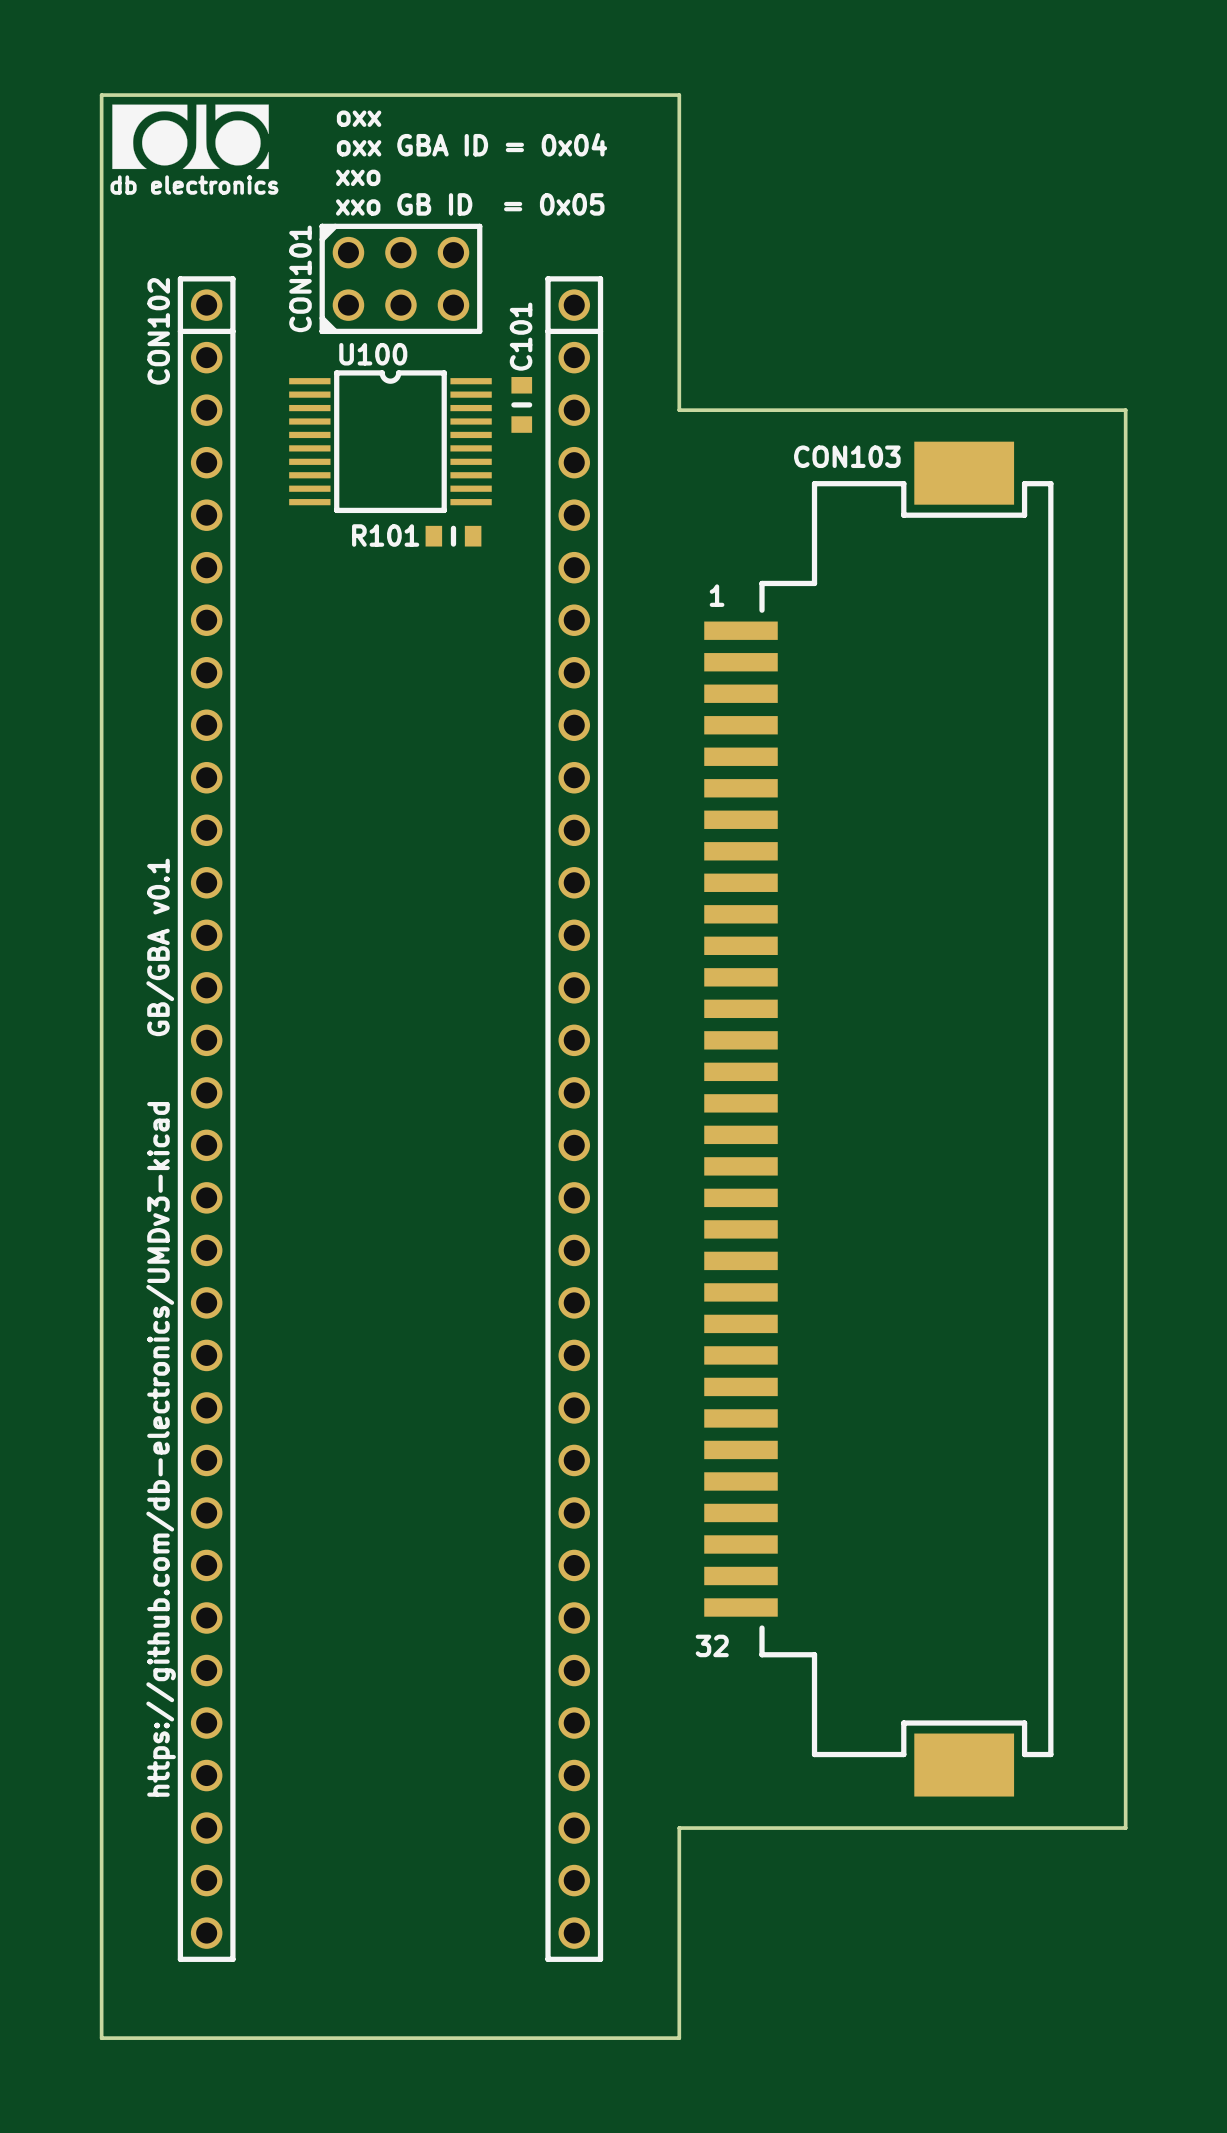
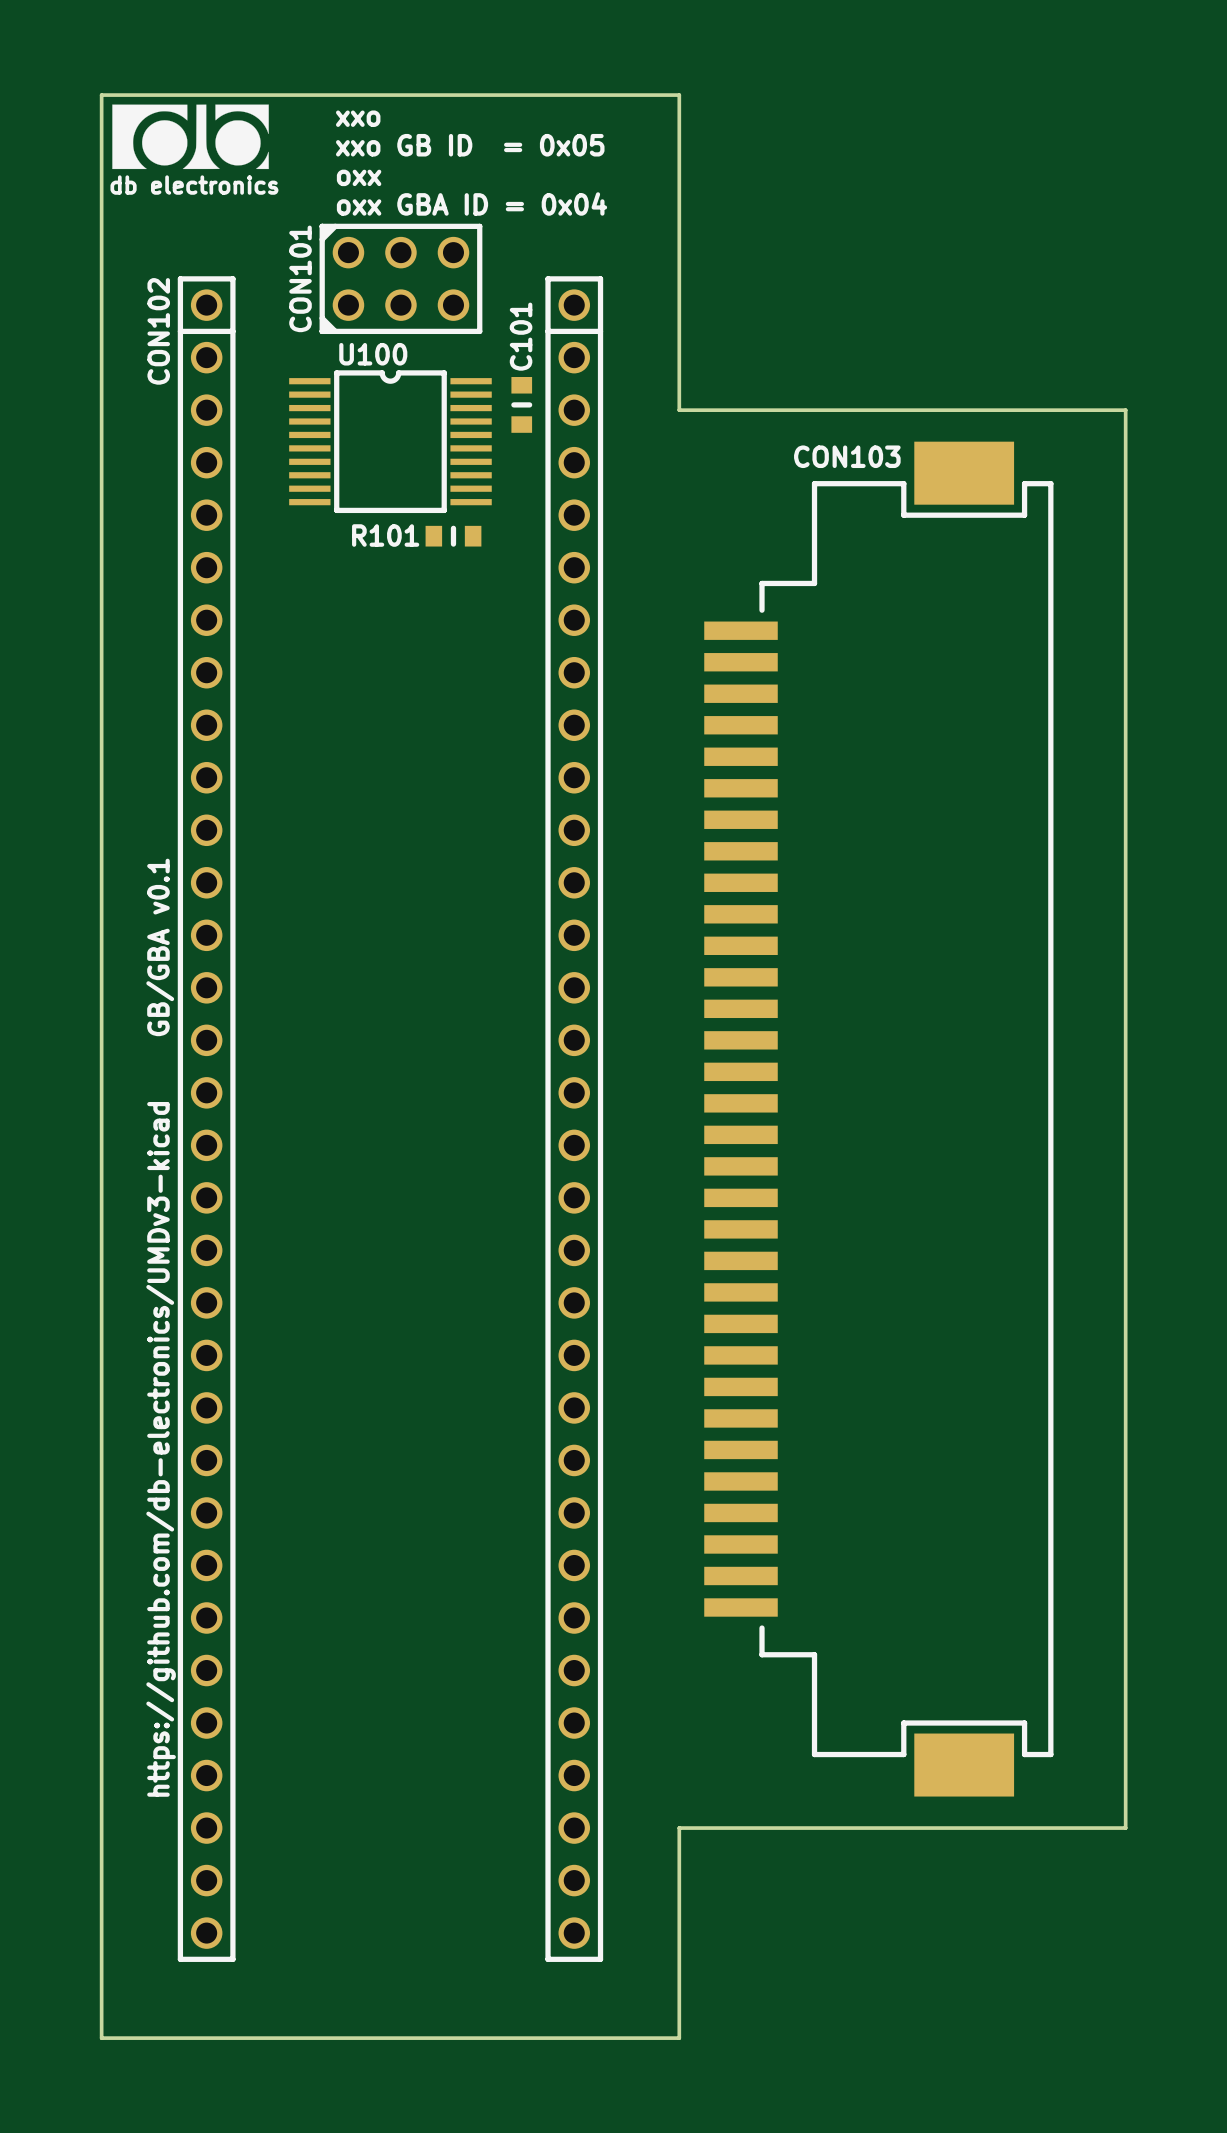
text: oxx (359, 118) -> xxo (358, 118)
text: oxx GBA ID = 0x04 (472, 144) -> xxo GB ID = 0x05 (470, 145)
text: xxo (358, 177) -> oxx (359, 177)
text: xxo GB ID = 0x05 (470, 204) -> oxx GBA ID = 0x04 (472, 203)
text: 1 (717, 595) -> none
text: 32 (712, 1645) -> none

